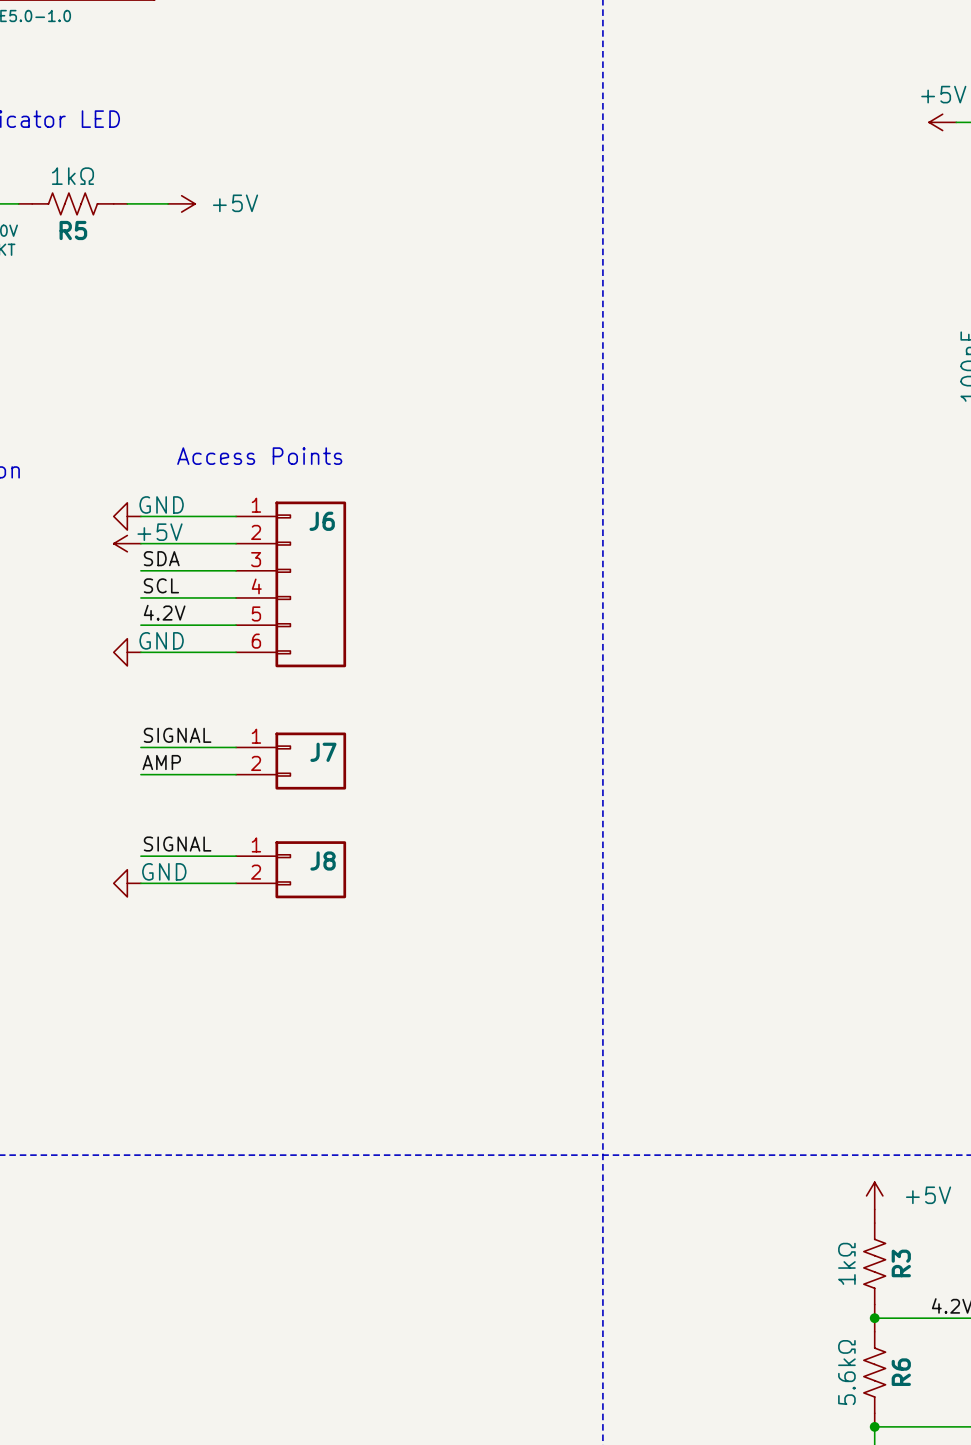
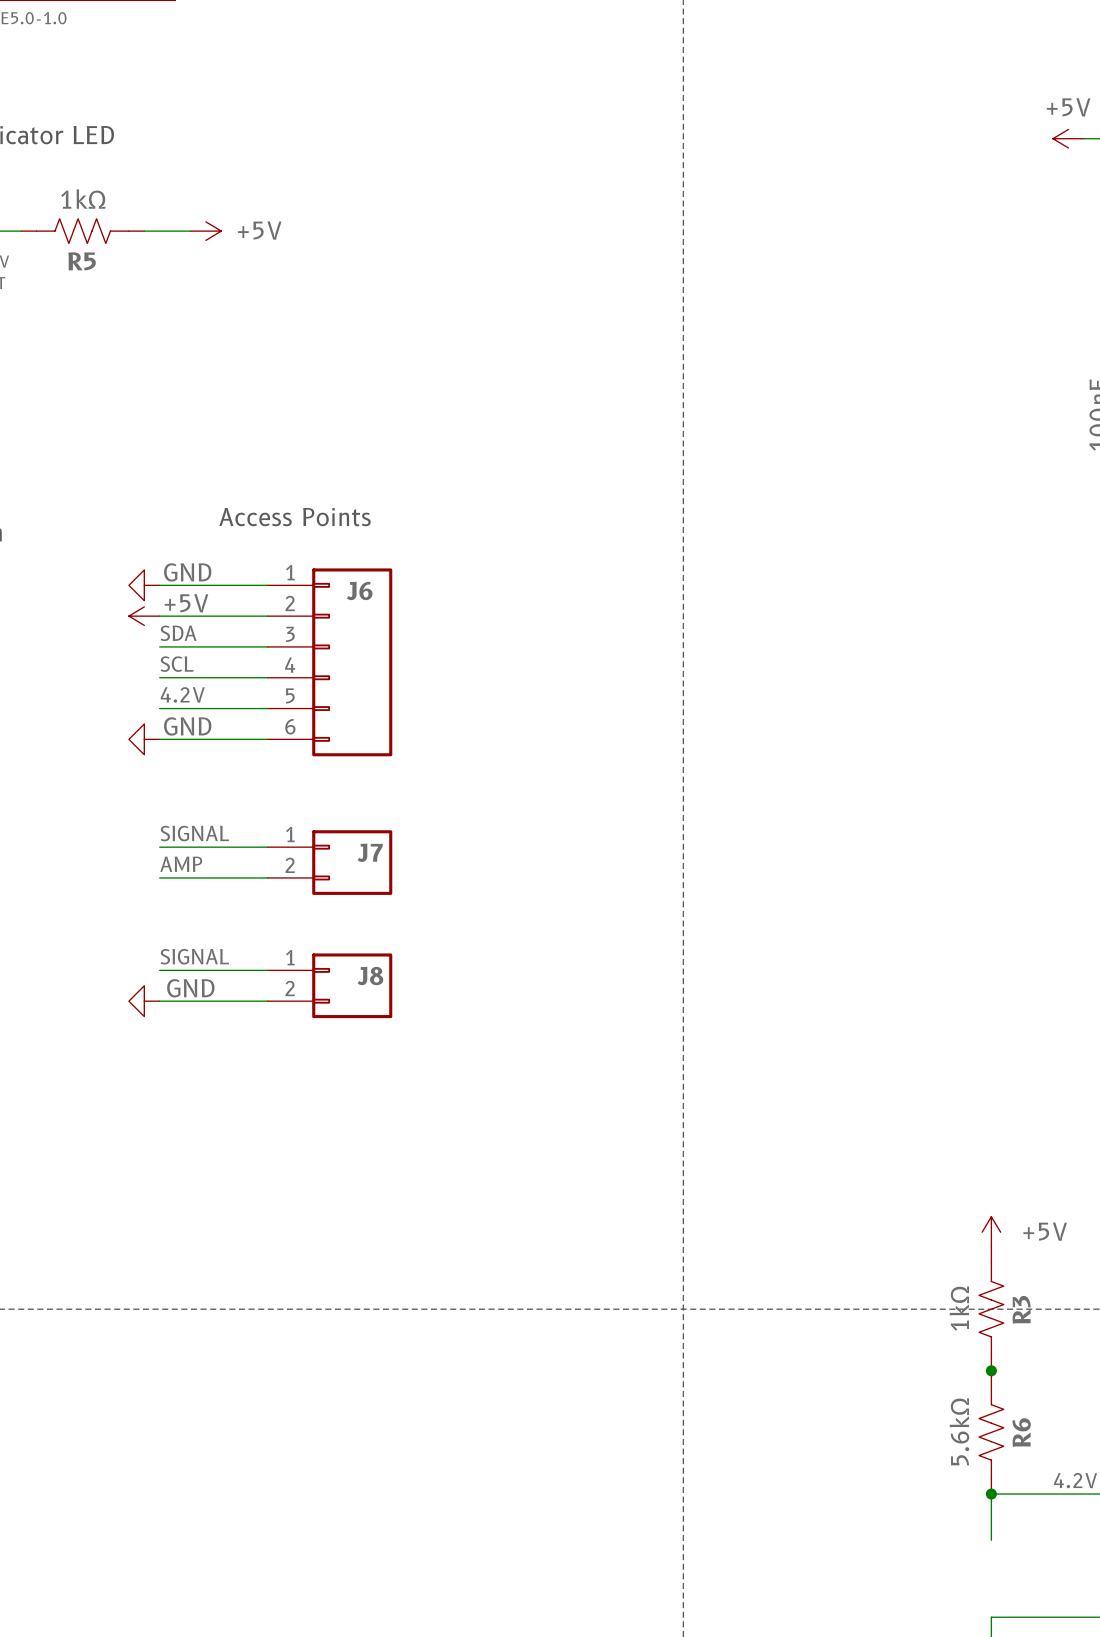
R3: none -> 1kΩ (991, 1309)
power symbol position: +5V (874, 1195) -> +5V (991, 1232)
junction: none -> (991, 1370)
R3 value: 1kΩ (846, 1263) -> 5.6kΩ (959, 1431)
R3 name: R3 (901, 1263) -> R6 (1021, 1432)
R6: 5.6kΩ (874, 1372) -> none
junction: (874, 1426) -> none

